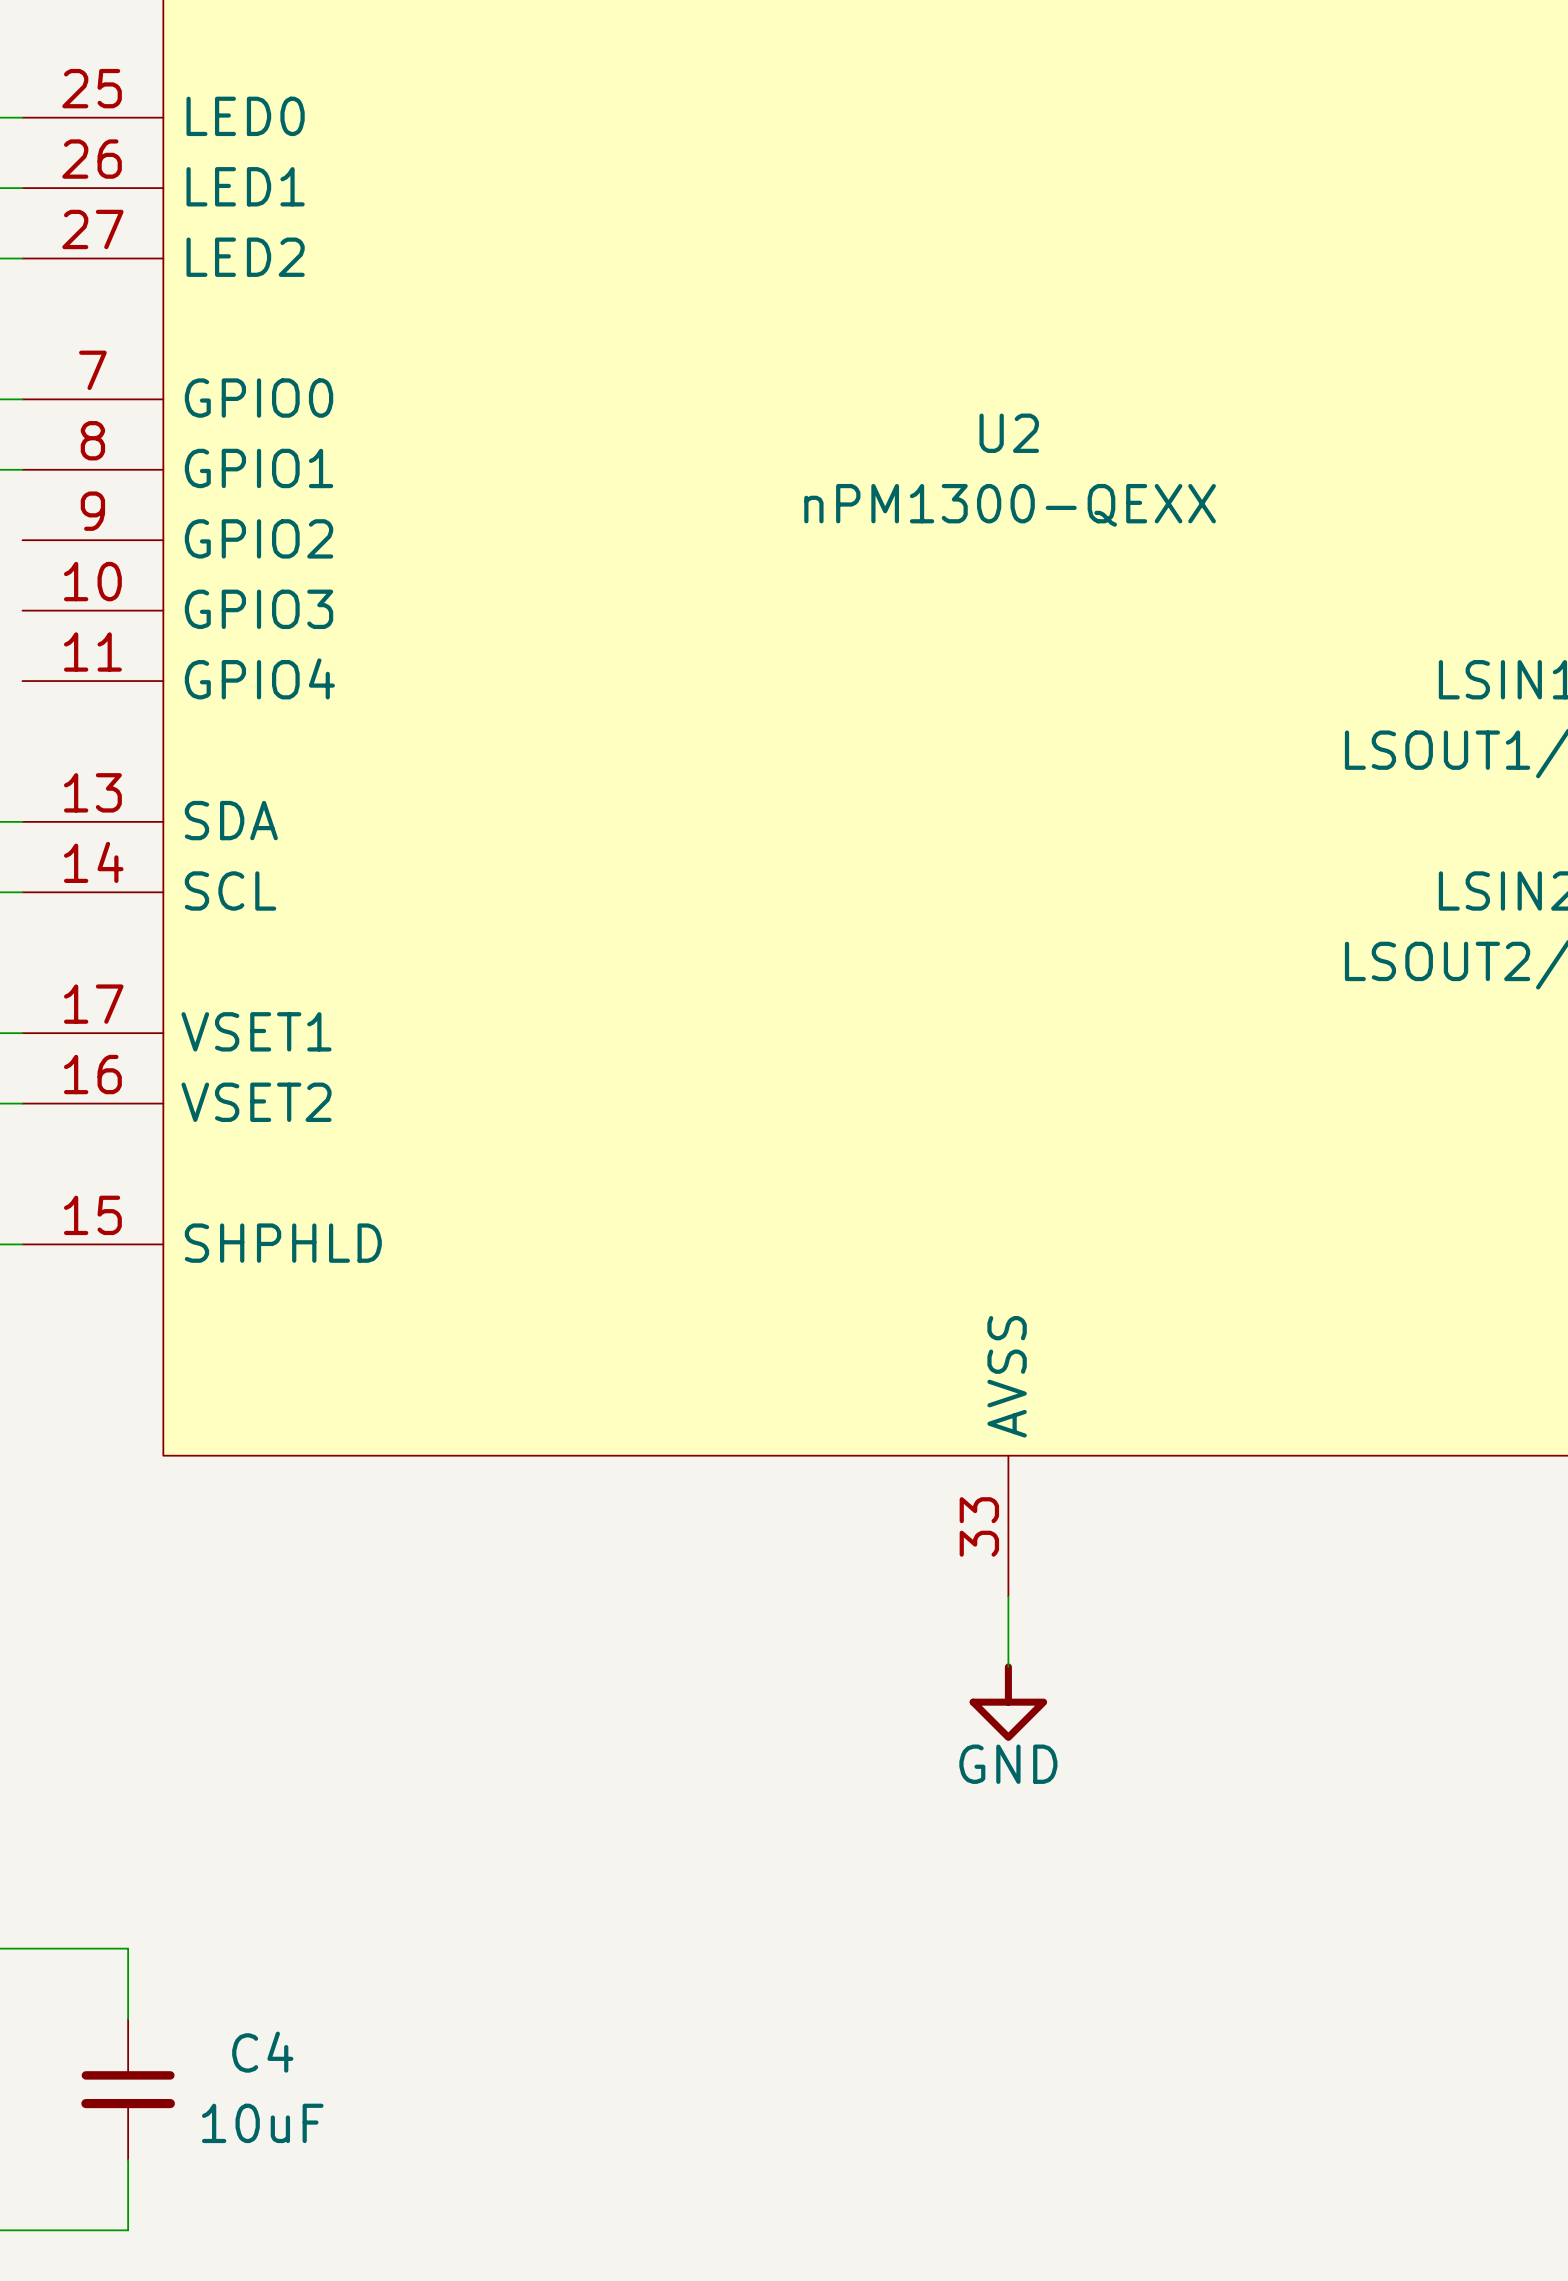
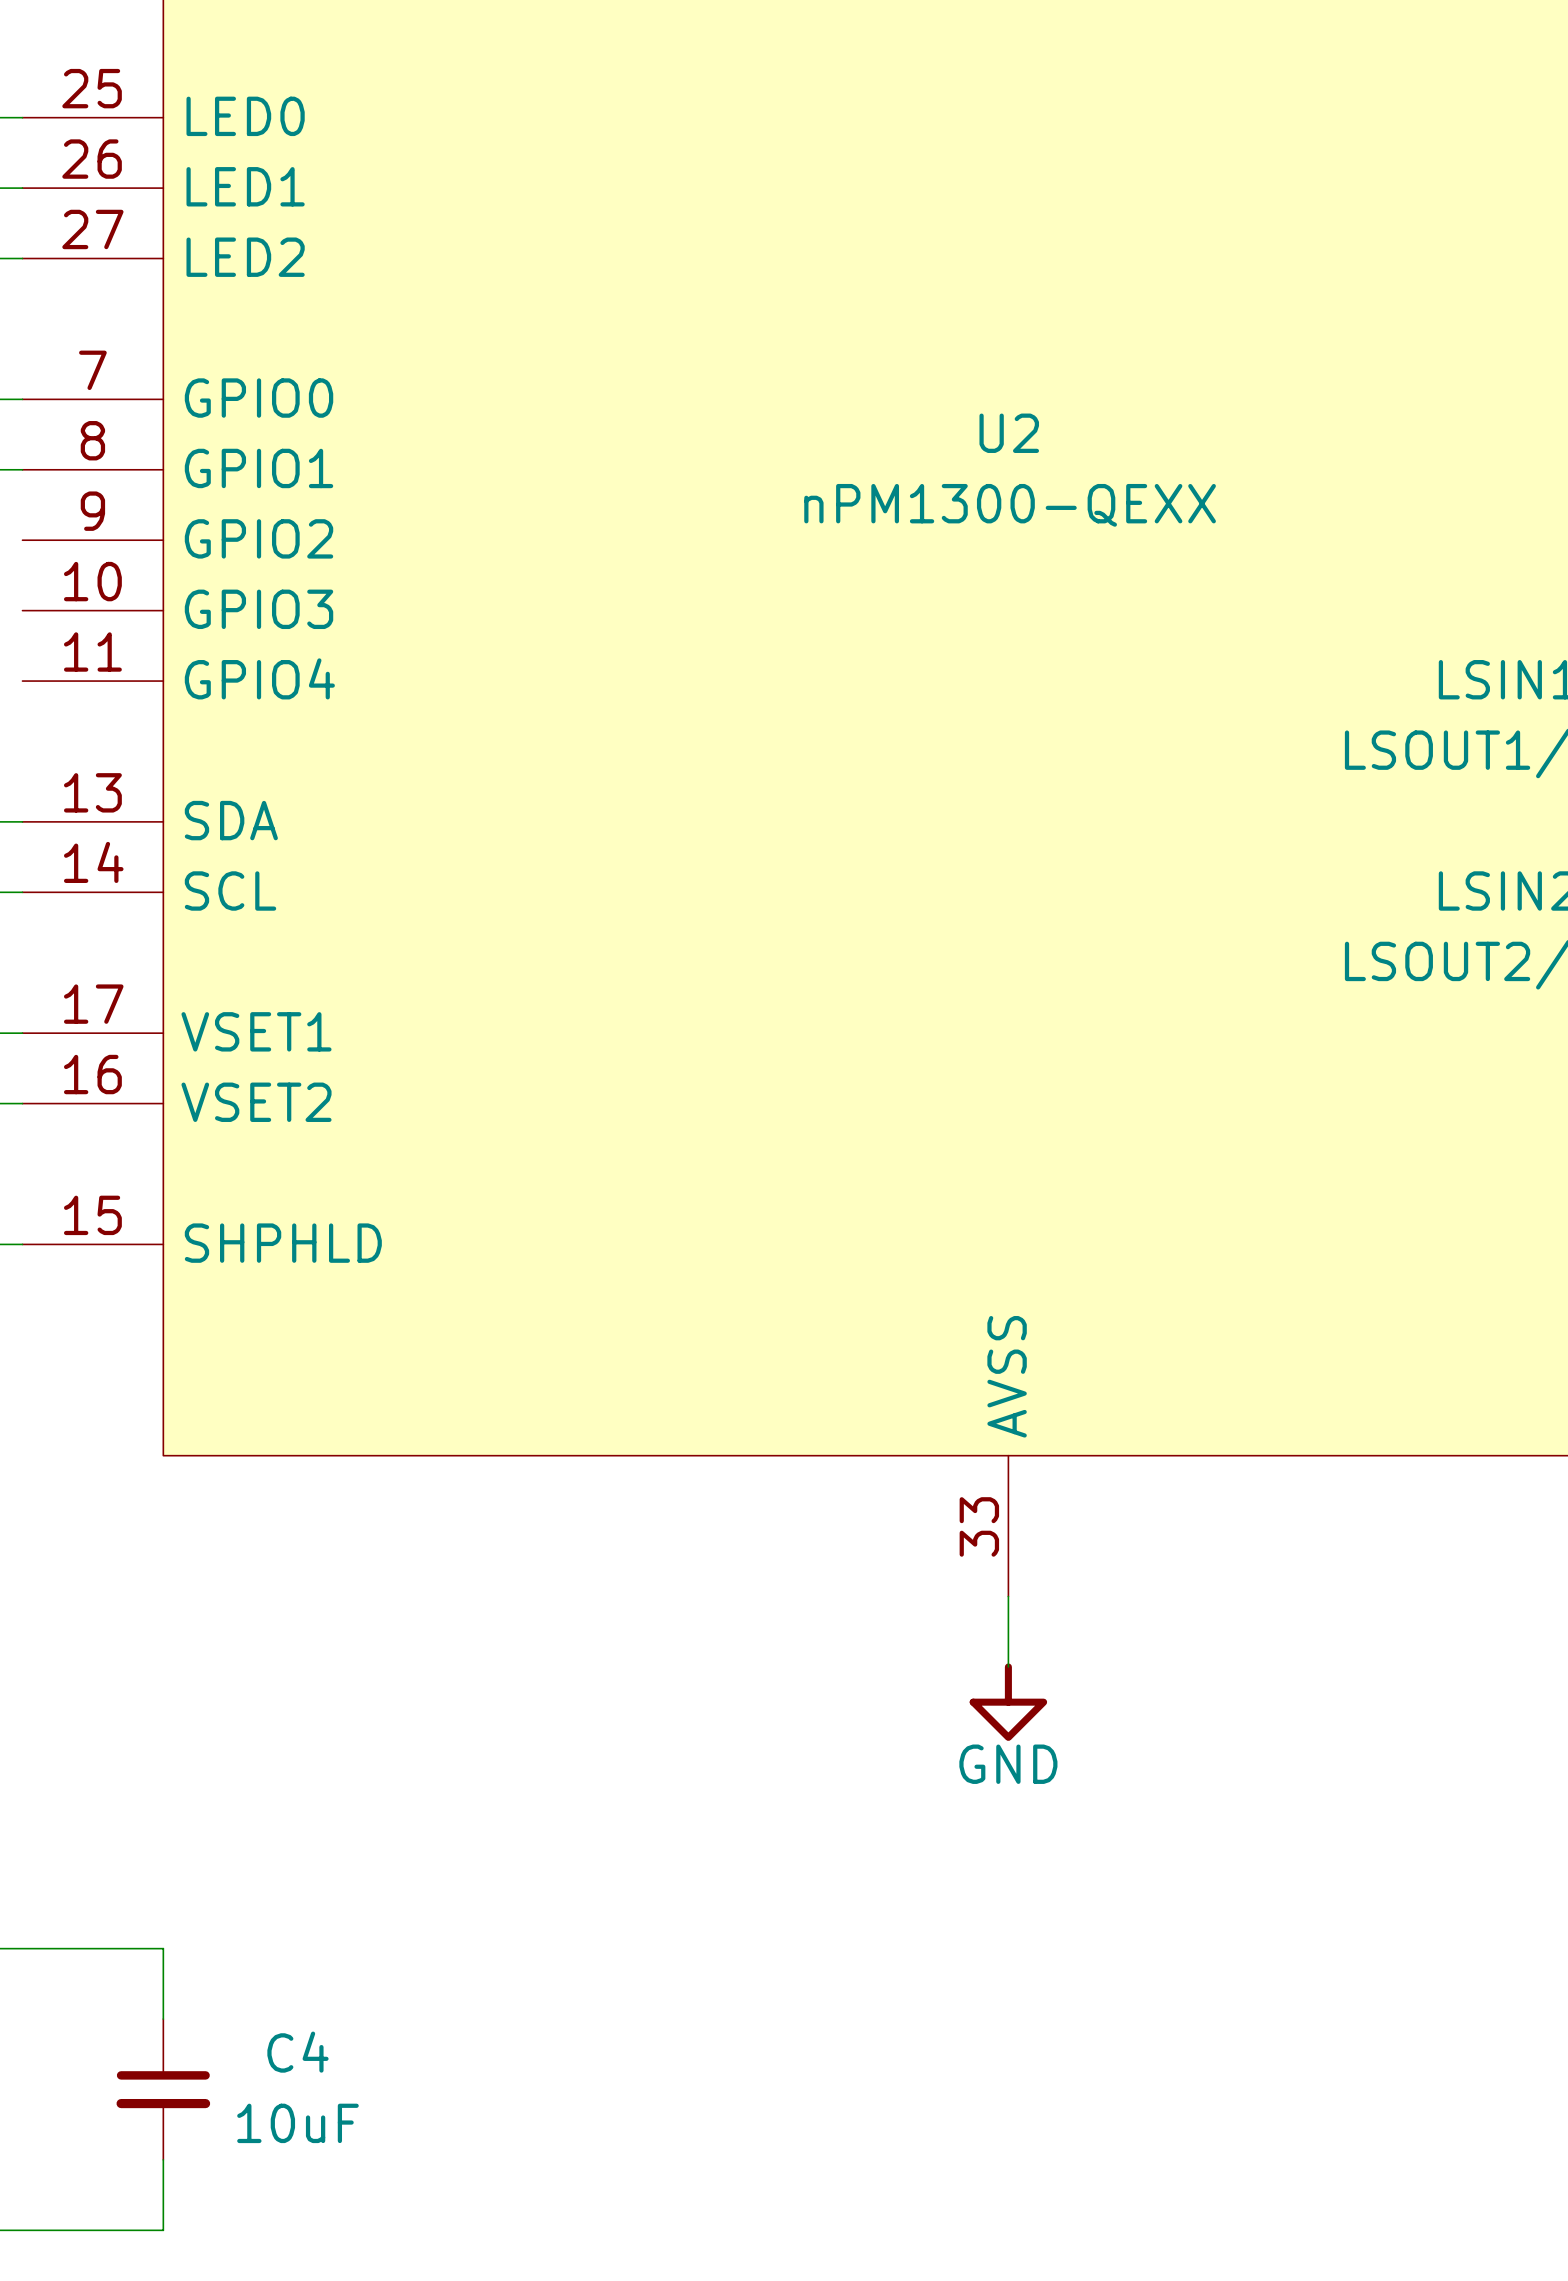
wire: (128, 1948) (128, 2019) -> (128, 1948) (163, 1948) (163, 2019)
C4 position: (128, 2089) -> (163, 2089)
wire: (128, 2159) (128, 2230) -> (163, 2159) (163, 2230) (128, 2230)

